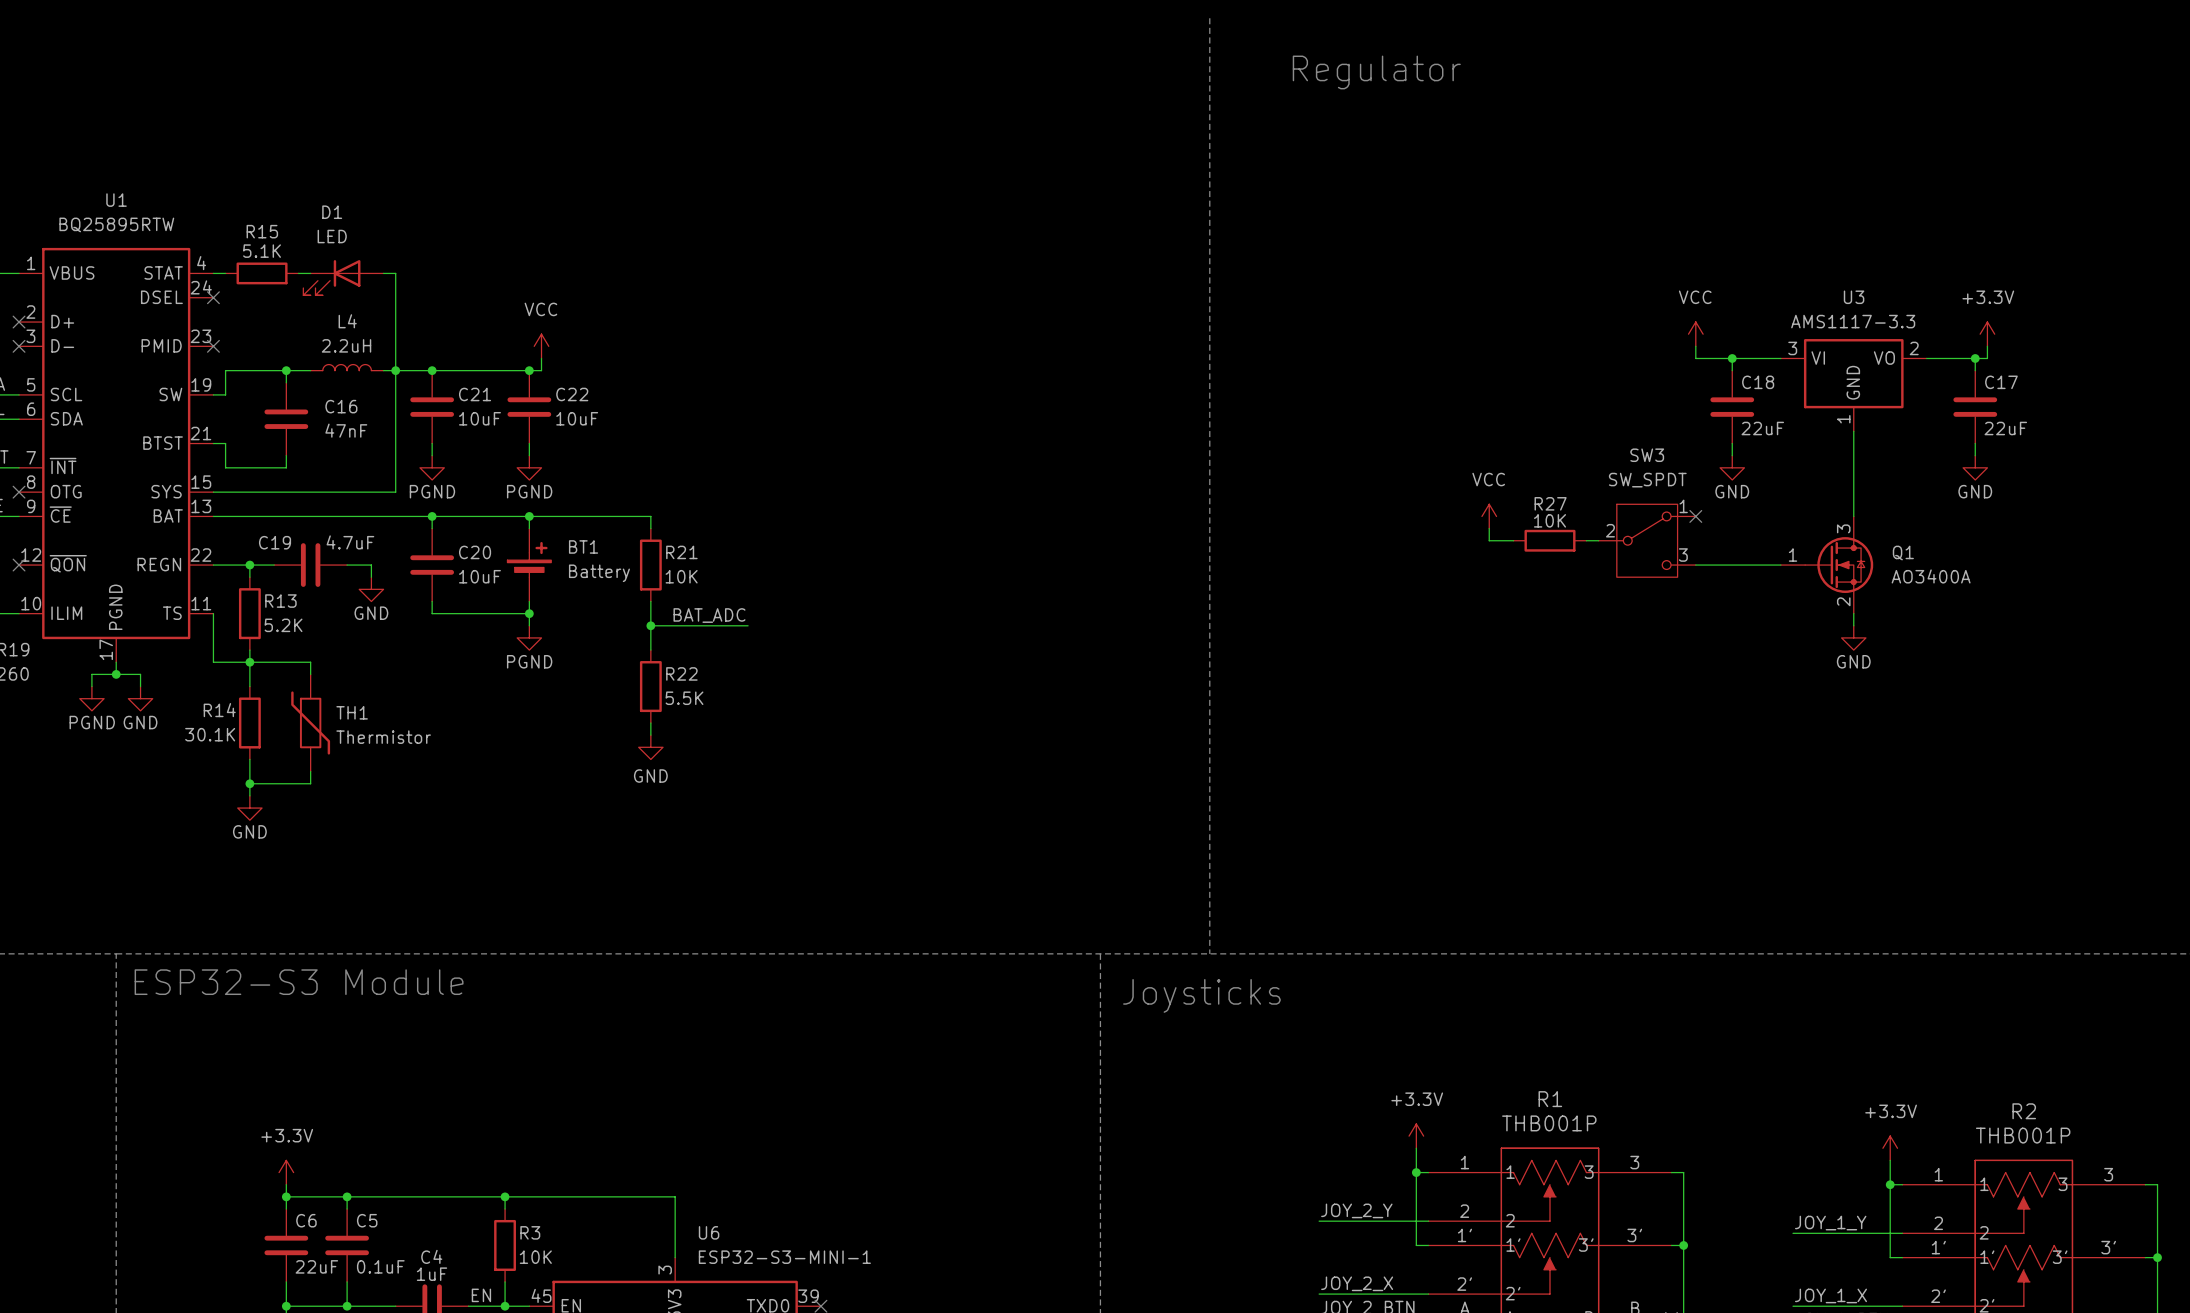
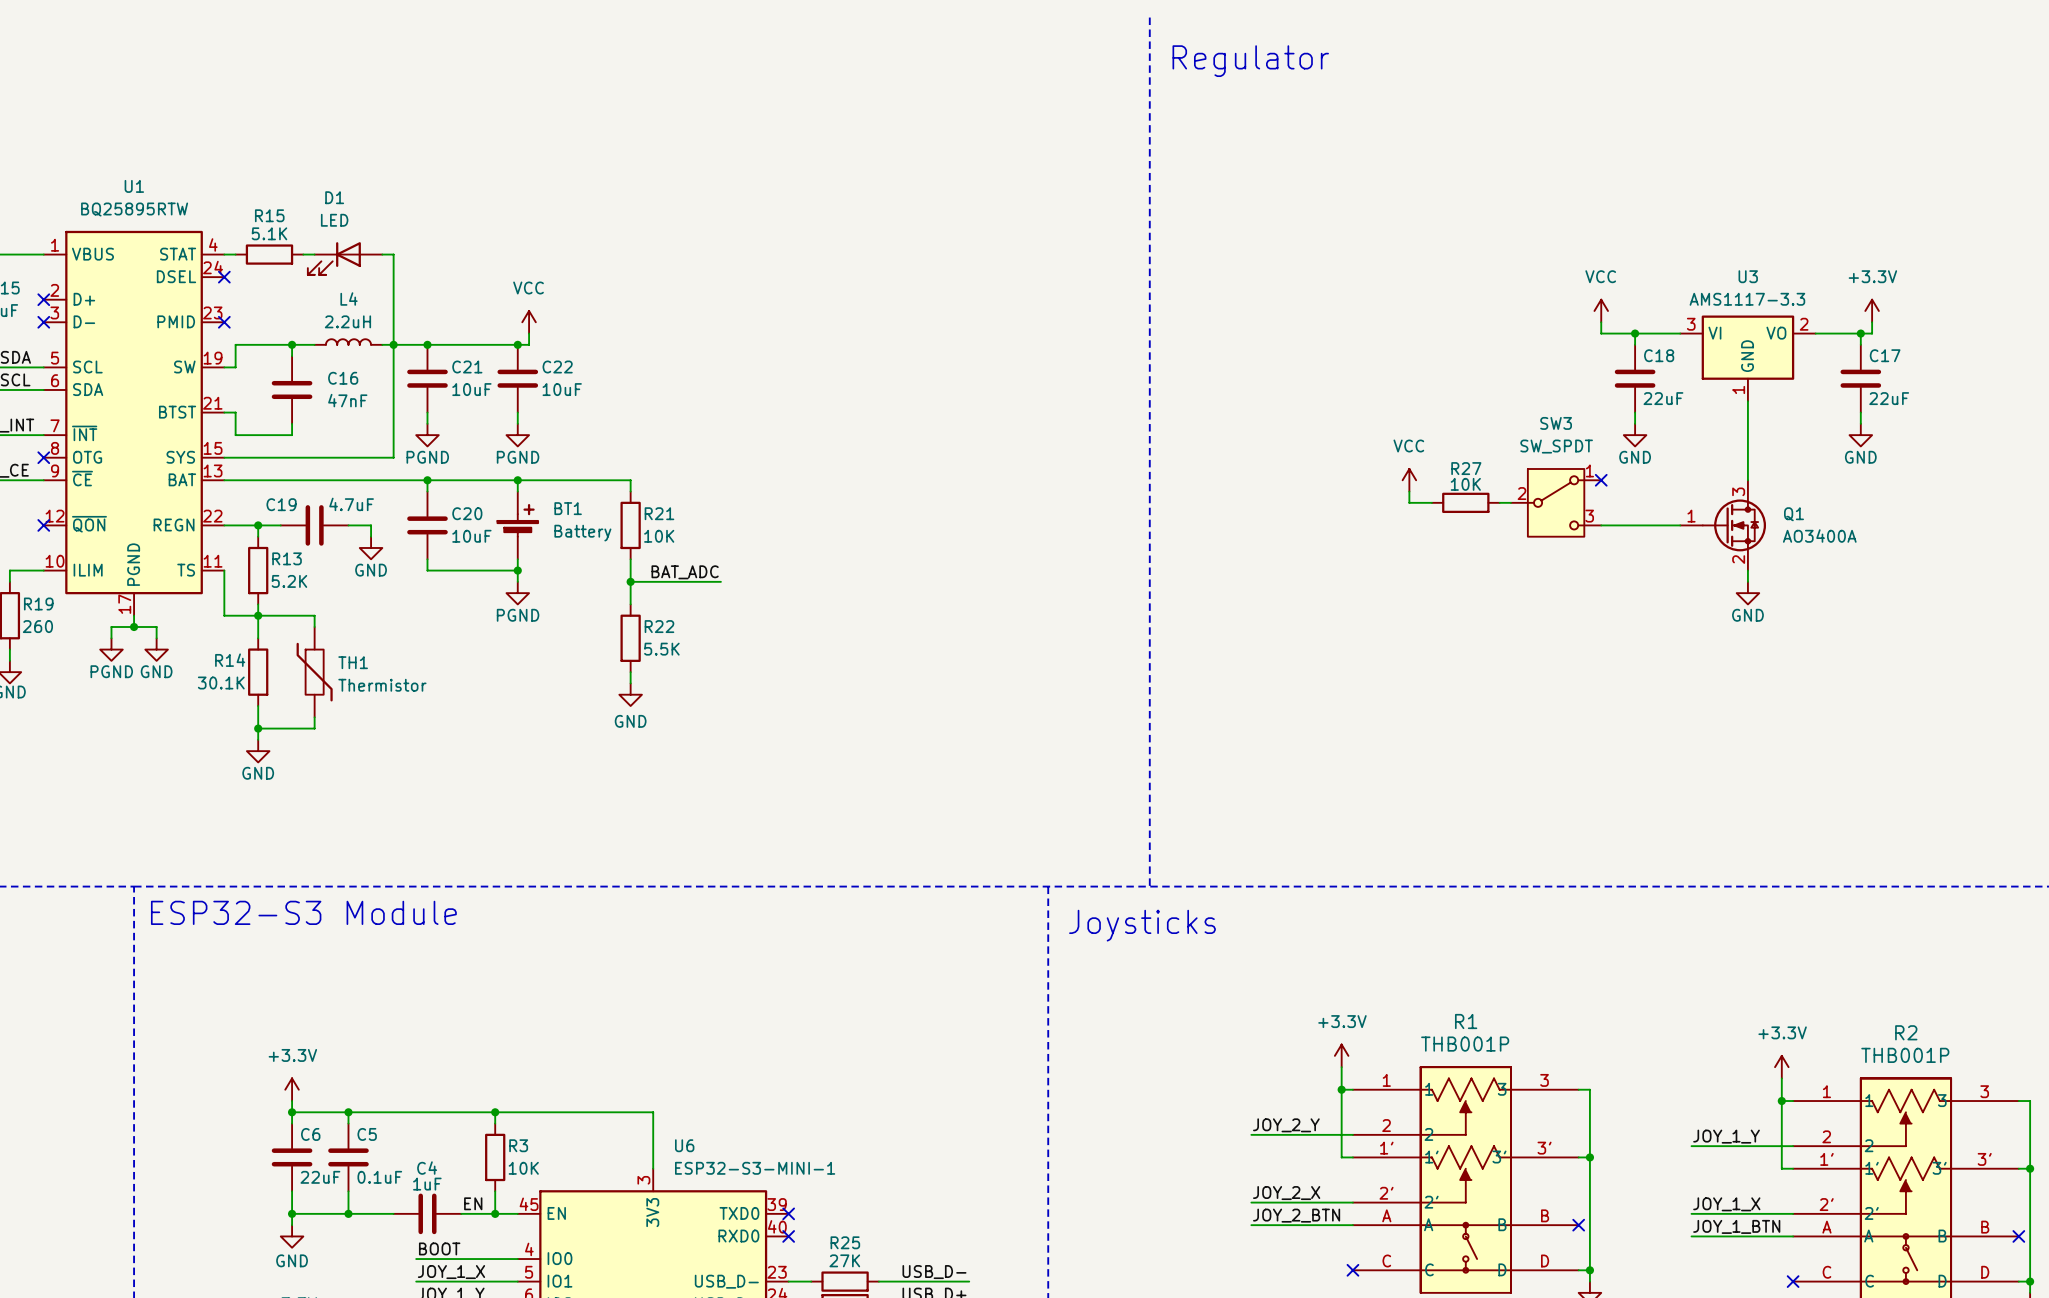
text position: Regulator (1376, 72) -> Regulator (1250, 61)

